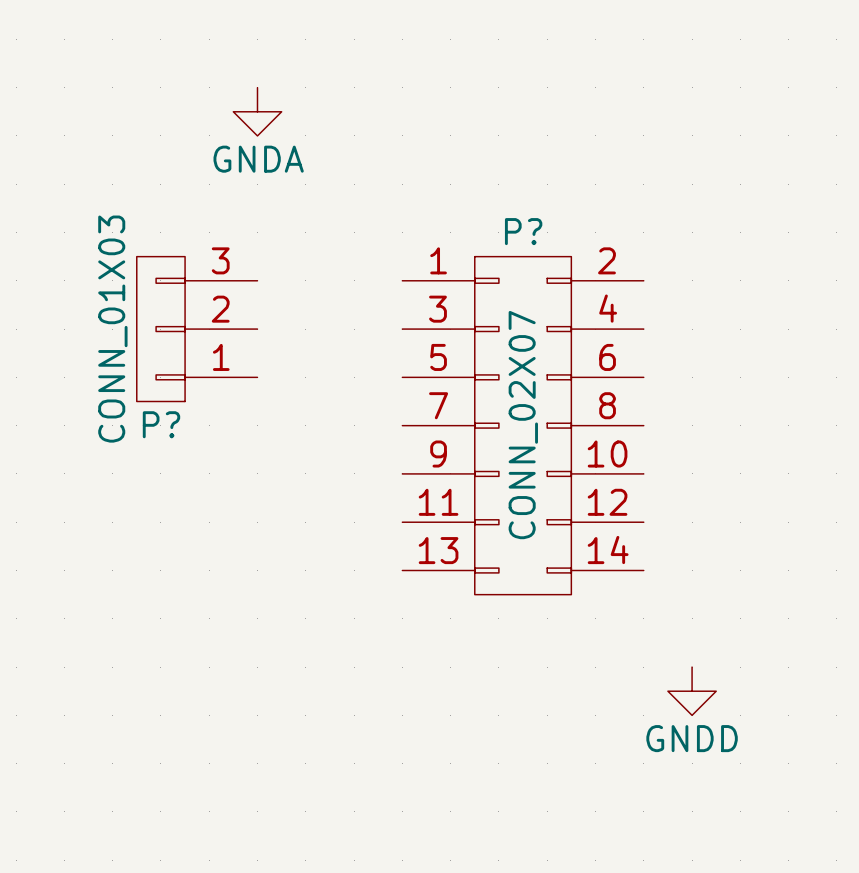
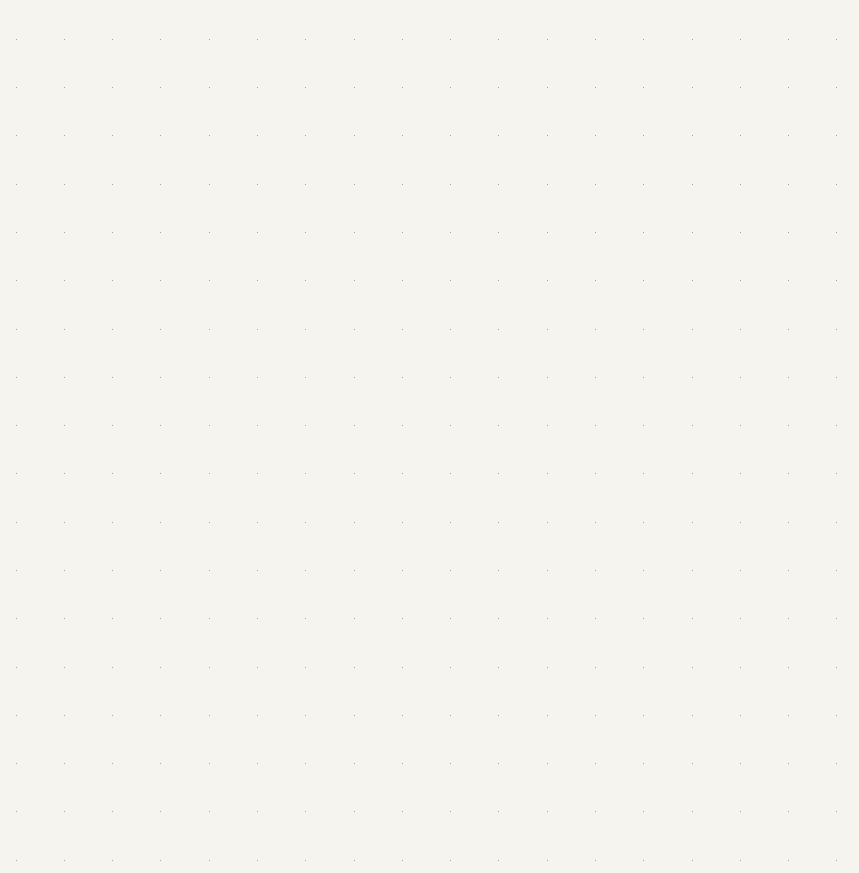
power symbol: GNDA (257, 111) -> none
P?: CONN_01X03 (197, 329) -> none
P?: CONN_02X07 (523, 425) -> none
power symbol: GNDD (692, 691) -> none

